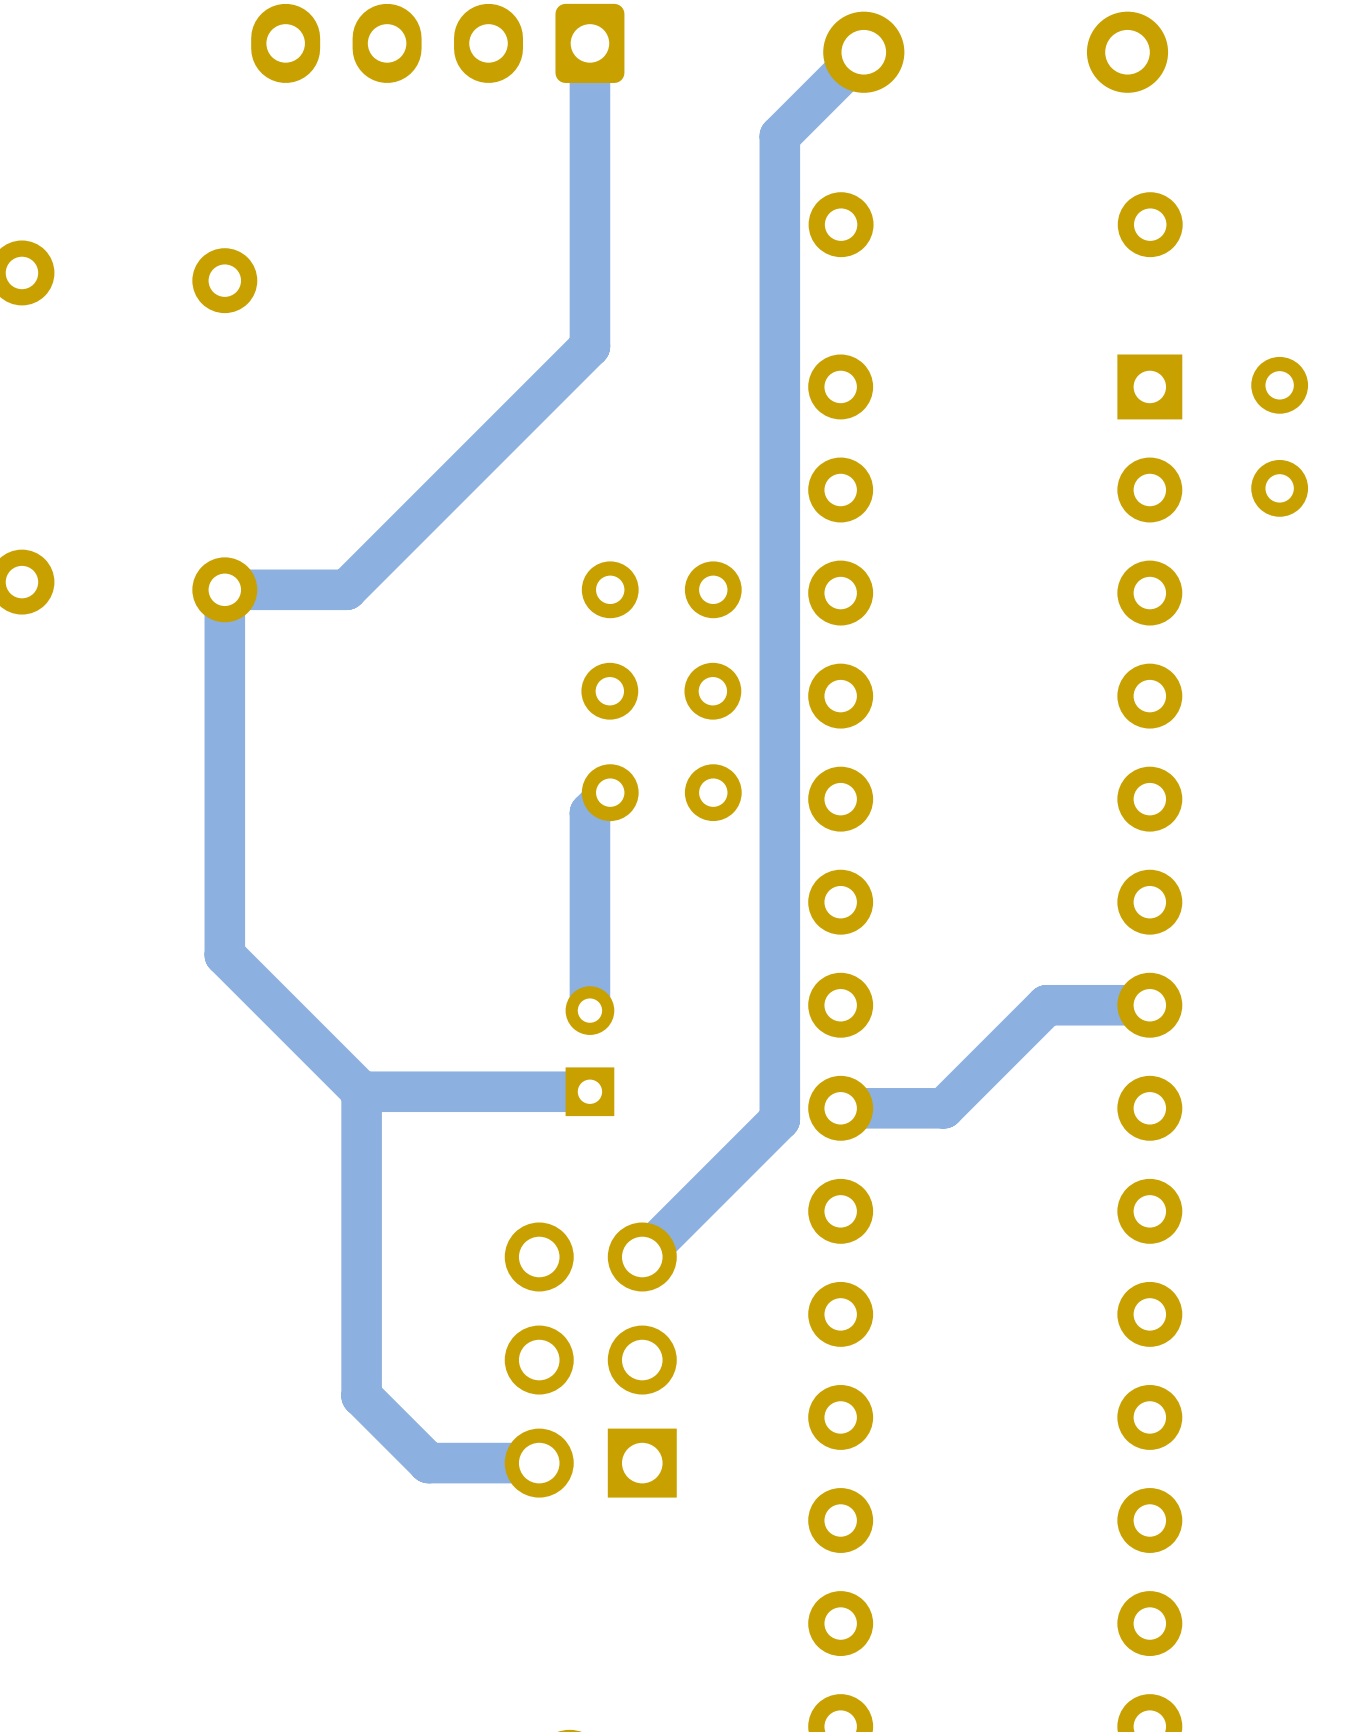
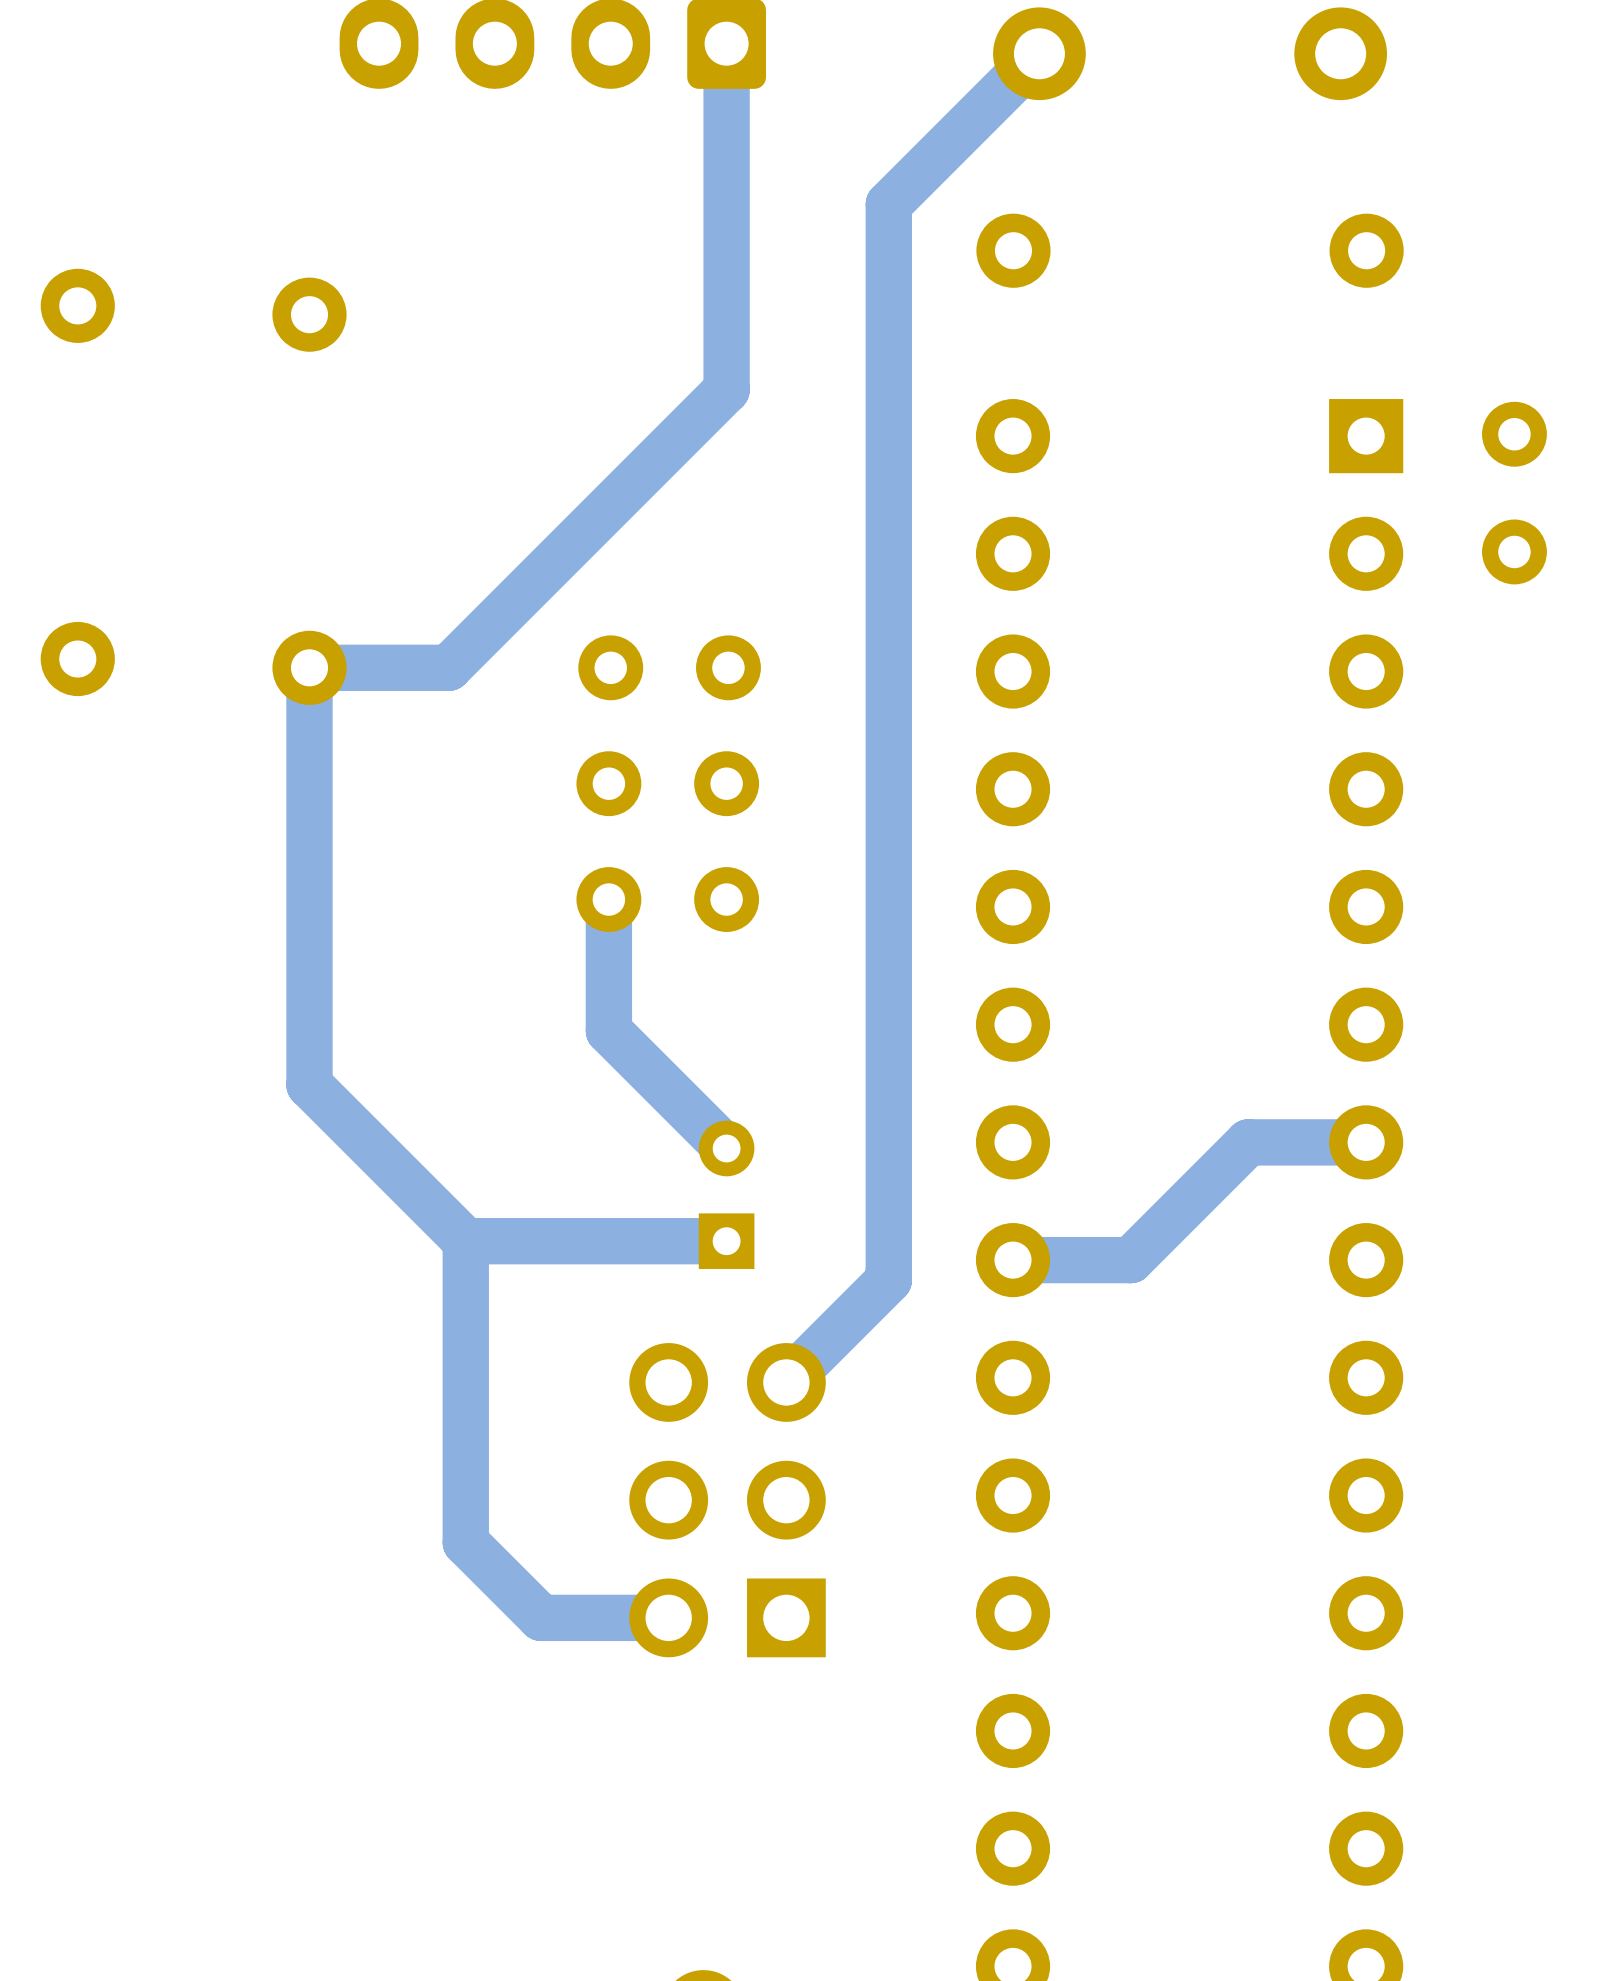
track: (779, 136) (779, 1119) (642, 1256) -> (943, 149) (888, 204) (888, 1280) (786, 1382)
part: none -> (669, 667)
part: (661, 589) -> none
part: none -> (667, 783)
part: (661, 691) -> none
part: none -> (667, 899)
track: (610, 792) (589, 812) (589, 1010) -> (608, 899) (608, 1030) (726, 1148)
part: (661, 792) -> none
track: (361, 1355) (361, 1396) (428, 1463) (539, 1463) -> (465, 1542) (541, 1617) (668, 1617)
part position: (590, 1360) -> (727, 1500)

